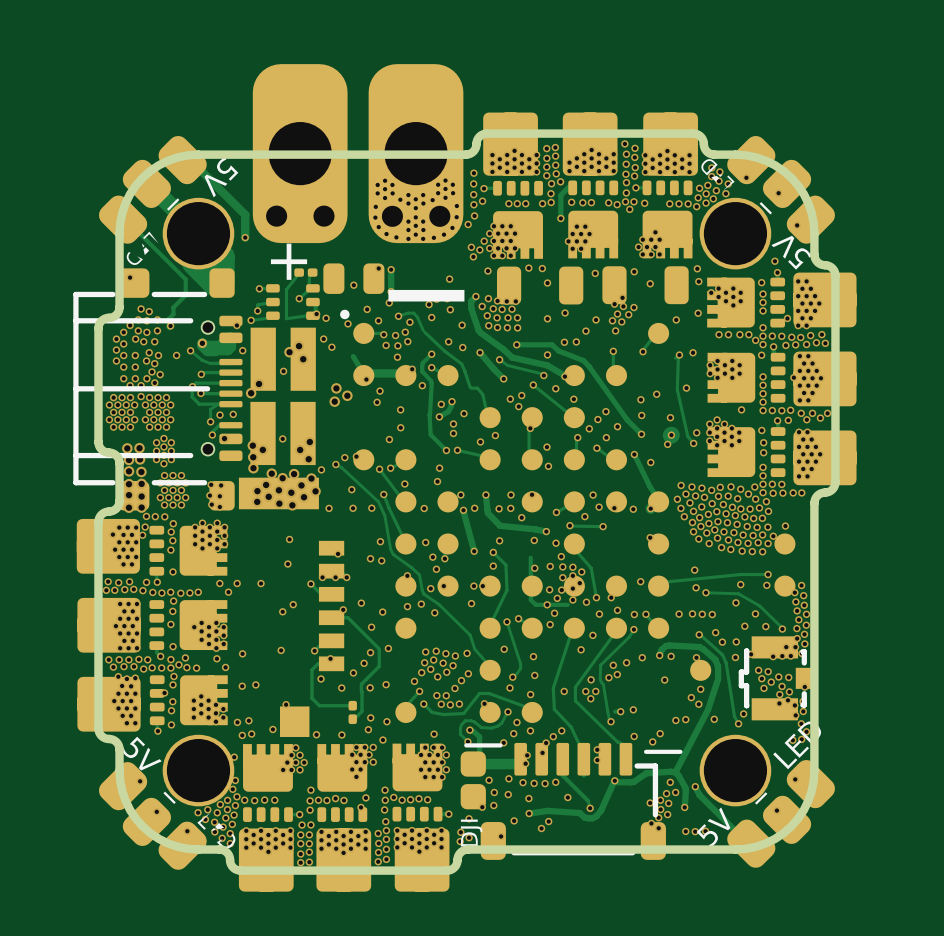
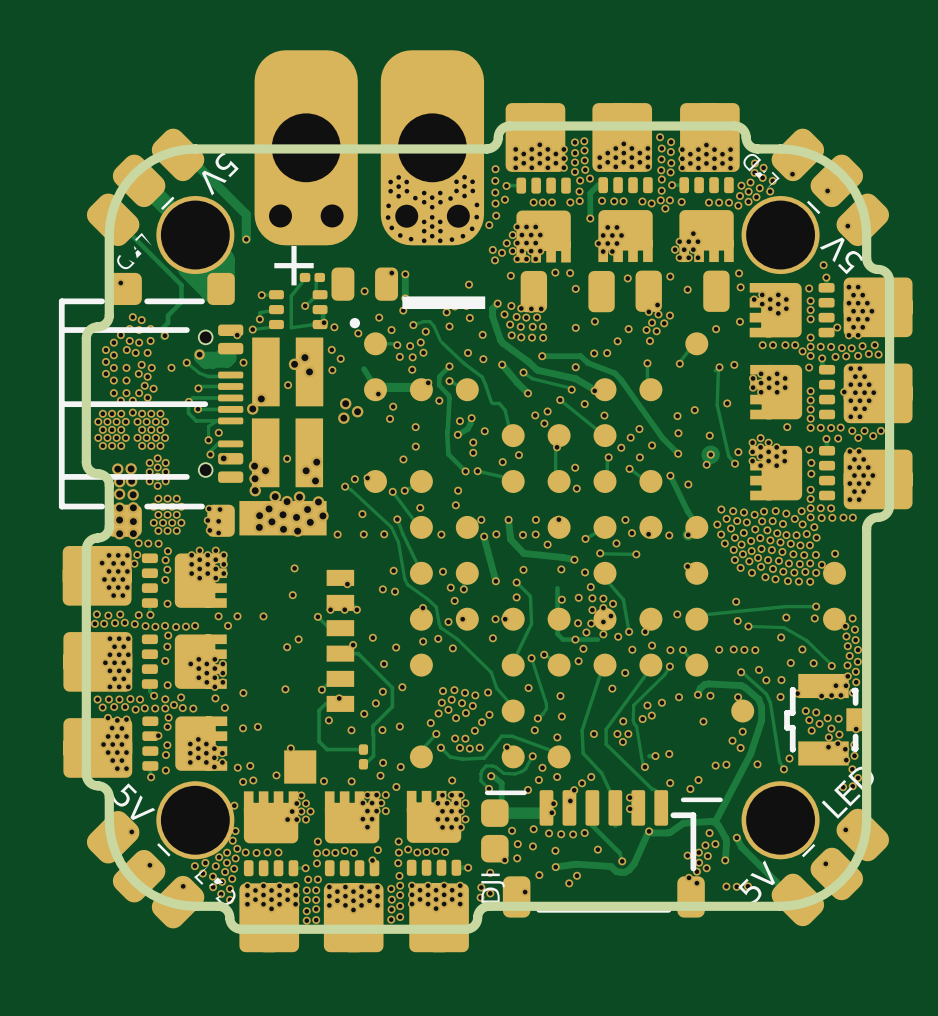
via: none -> (332, 370)
via: (233, 414) -> none
via: (321, 469) -> none

